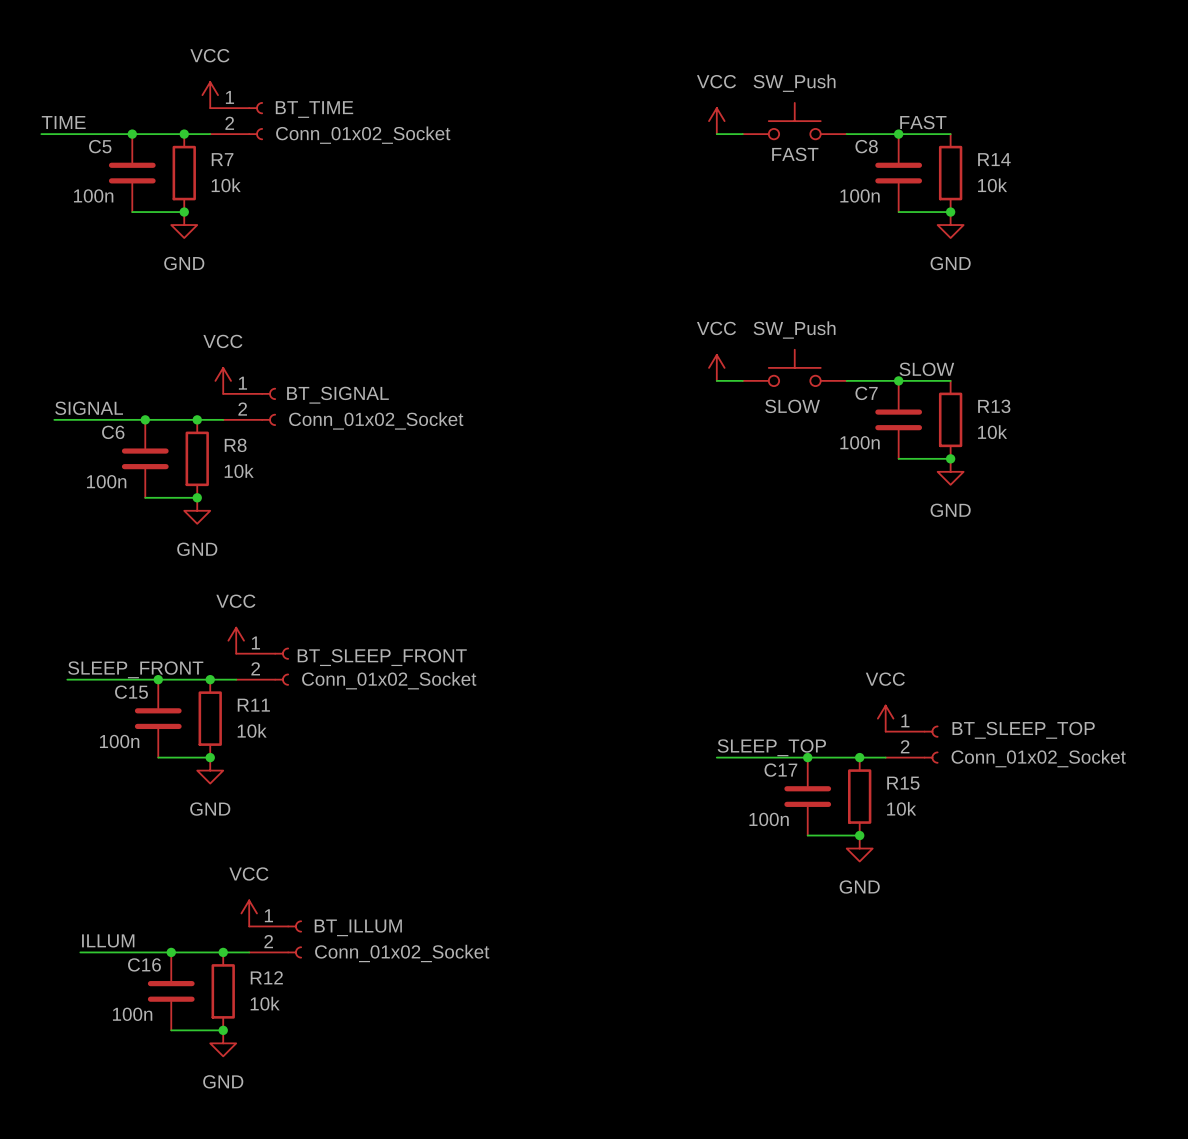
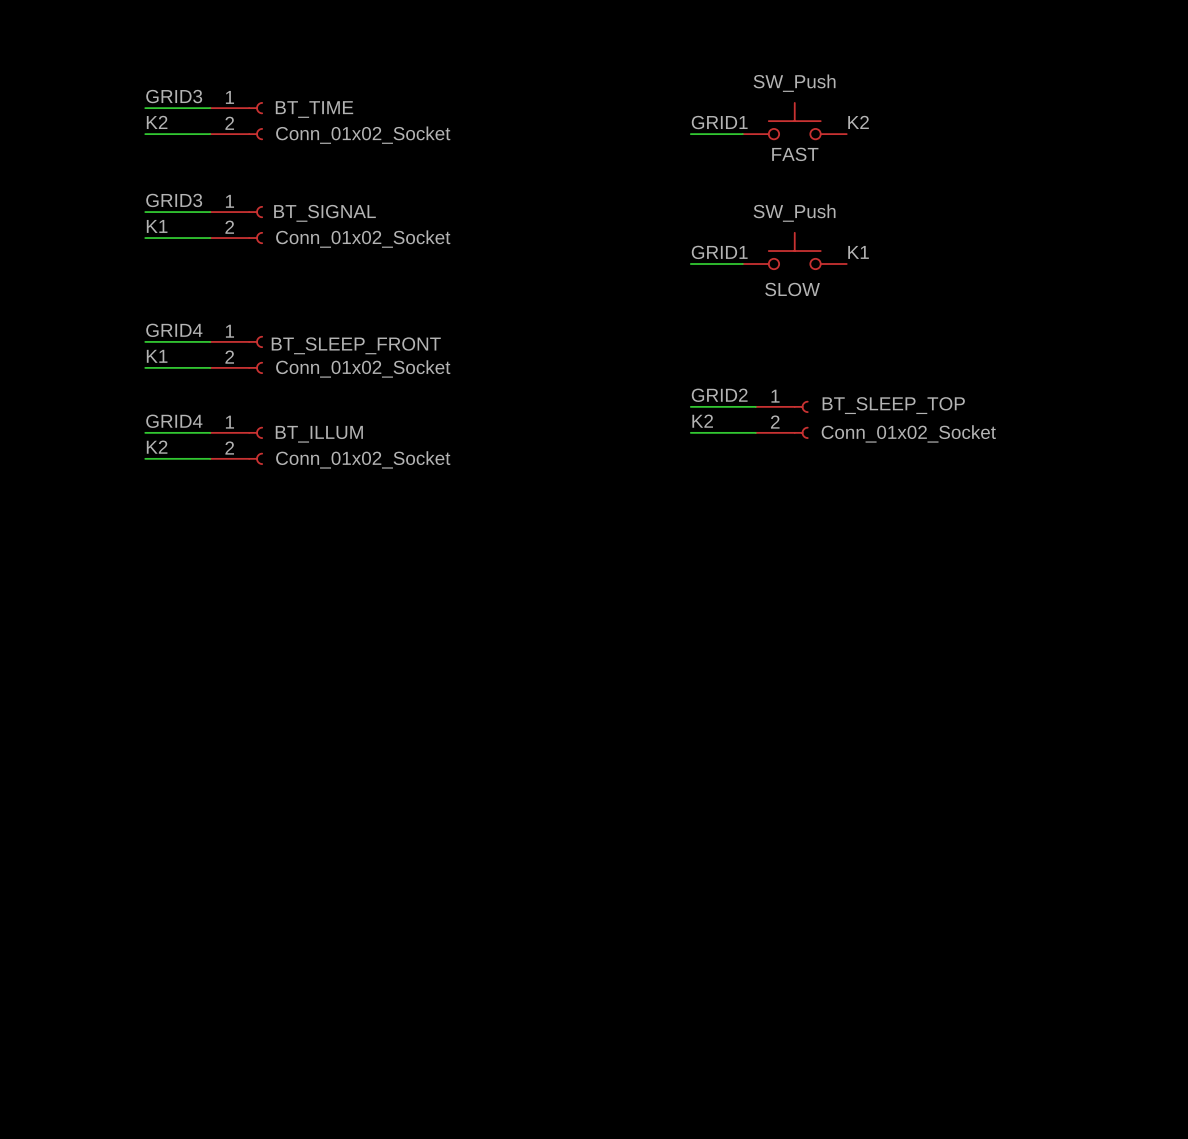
power symbol: VCC (210, 95) -> none
label: none -> GRID3 (174, 96)
wire: none -> (145, 108) (210, 108)
power symbol: VCC (716, 121) -> none
label: TIME (63, 122) -> none
label: none -> K2 (157, 122)
label: none -> GRID1 (719, 122)
label: none -> K2 (858, 122)
label: FAST (923, 122) -> none
wire: (41, 134) (145, 134) -> none
junction: (132, 134) -> none
junction: (184, 134) -> none
wire: (846, 134) (950, 134) -> none
junction: (898, 134) -> none
C5: 100n (132, 173) -> none
R7: 10k (184, 173) -> none
C8: 100n (898, 173) -> none
R14: 10k (950, 173) -> none
label: none -> GRID3 (174, 200)
wire: (132, 212) (145, 212) -> none
wire: none -> (184, 212) (210, 212)
junction: (184, 212) -> none
wire: (898, 212) (950, 212) -> (690, 264) (742, 264)
junction: (950, 212) -> none
power symbol: GND (184, 225) -> none
power symbol: GND (950, 225) -> none
label: none -> K1 (157, 226)
wire: none -> (145, 238) (210, 238)
label: none -> GRID1 (719, 252)
label: none -> K1 (858, 252)
label: none -> GRID4 (174, 330)
wire: none -> (145, 341) (210, 341)
part: none -> Conn_01x02_Socket (236, 354)
label: none -> K1 (157, 356)
wire: none -> (145, 367) (210, 367)
power symbol: VCC (716, 367) -> none
part position: (794, 367) -> (794, 251)
label: SLOW (926, 369) -> none
power symbol: VCC (223, 380) -> none
wire: (716, 380) (742, 380) -> (690, 134) (716, 134)
wire: (846, 380) (950, 380) -> none
junction: (898, 380) -> none
label: none -> GRID2 (719, 395)
part position: (249, 406) -> (236, 225)
wire: none -> (690, 406) (755, 406)
label: SIGNAL (89, 408) -> none
wire: (54, 419) (223, 419) -> none
junction: (145, 419) -> none
junction: (197, 419) -> none
part: none -> Conn_01x02_Socket (782, 419)
C7: 100n (898, 419) -> none
R13: 10k (950, 419) -> none
label: none -> GRID4 (174, 421)
label: none -> K2 (702, 421)
wire: none -> (145, 432) (210, 432)
wire: none -> (690, 432) (755, 432)
part: none -> Conn_01x02_Socket (236, 445)
label: none -> K2 (157, 447)
wire: none -> (145, 458) (210, 458)
C6: 100n (145, 458) -> none
R8: 10k (197, 458) -> none
wire: (898, 458) (950, 458) -> none
junction: (950, 458) -> none
power symbol: GND (950, 471) -> none
wire: (145, 497) (197, 497) -> none
junction: (197, 497) -> none
power symbol: GND (197, 510) -> none
power symbol: VCC (236, 640) -> none
part: Conn_01x02_Socket (262, 666) -> none
label: SLEEP_FRONT (135, 669) -> none
wire: (67, 679) (236, 679) -> none
junction: (158, 679) -> none
junction: (210, 679) -> none
C15: 100n (158, 718) -> none
R11: 10k (210, 718) -> none
power symbol: VCC (885, 718) -> none
part: Conn_01x02_Socket (912, 744) -> none
label: SLEEP_TOP (771, 747) -> none
wire: (158, 757) (210, 757) -> none
junction: (210, 757) -> none
wire: (716, 757) (885, 757) -> none
junction: (807, 757) -> none
junction: (859, 757) -> none
power symbol: GND (210, 770) -> none
C17: 100n (807, 796) -> none
R15: 10k (859, 796) -> none
wire: (807, 835) (859, 835) -> none
junction: (859, 835) -> none
power symbol: GND (859, 848) -> none
power symbol: VCC (249, 913) -> none
part: Conn_01x02_Socket (275, 939) -> none
label: ILLUM (108, 940) -> none
wire: (80, 952) (249, 952) -> none
junction: (171, 952) -> none
junction: (223, 952) -> none
C16: 100n (171, 991) -> none
R12: 10k (223, 991) -> none
wire: (171, 1030) (223, 1030) -> none
junction: (223, 1030) -> none
power symbol: GND (223, 1043) -> none

